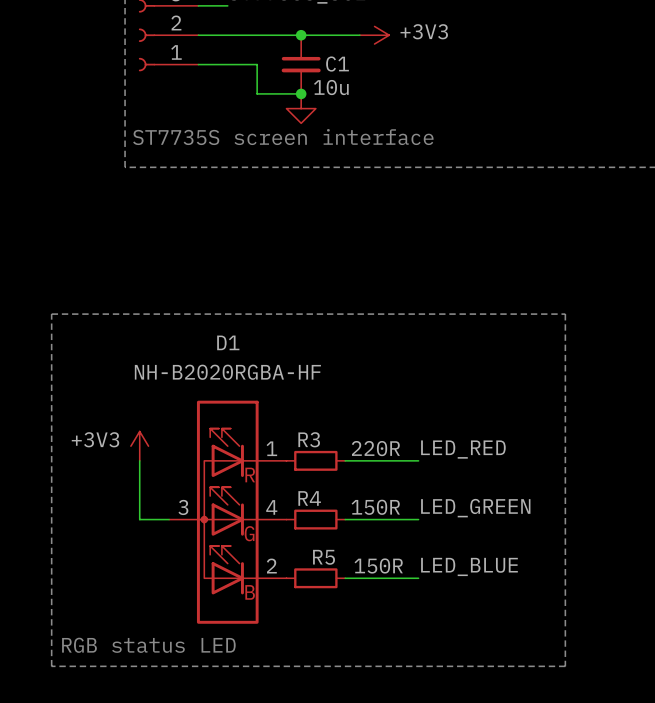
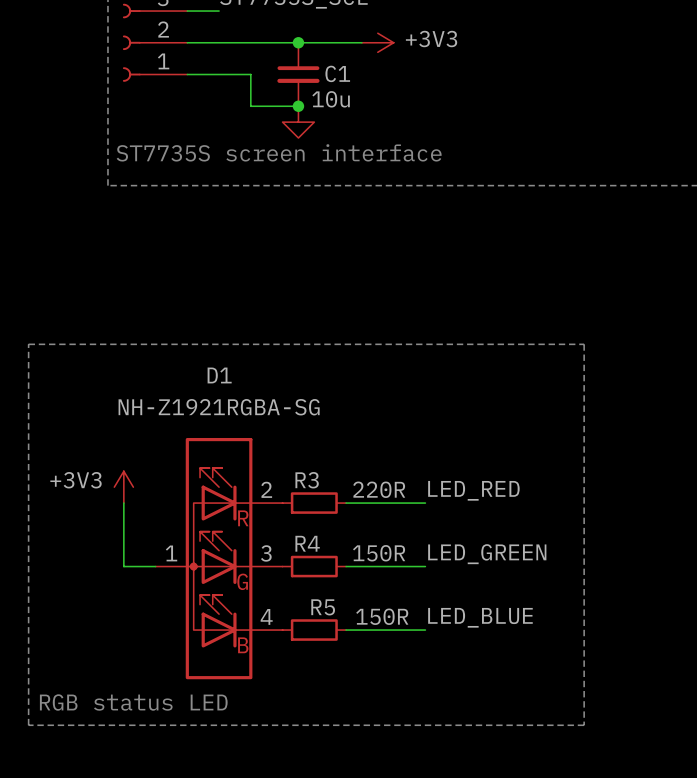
D1 value: NH-B2020RGBA-HF (227, 372) -> NH-Z1921RGBA-SG (219, 407)
D1 pin number: 1 (271, 448) -> 2 (266, 489)
D1 pin number: 3 (183, 507) -> 1 (171, 553)
D1 pin number: 4 (271, 507) -> 3 (266, 553)
D1 pin number: 2 (271, 566) -> 4 (266, 616)

